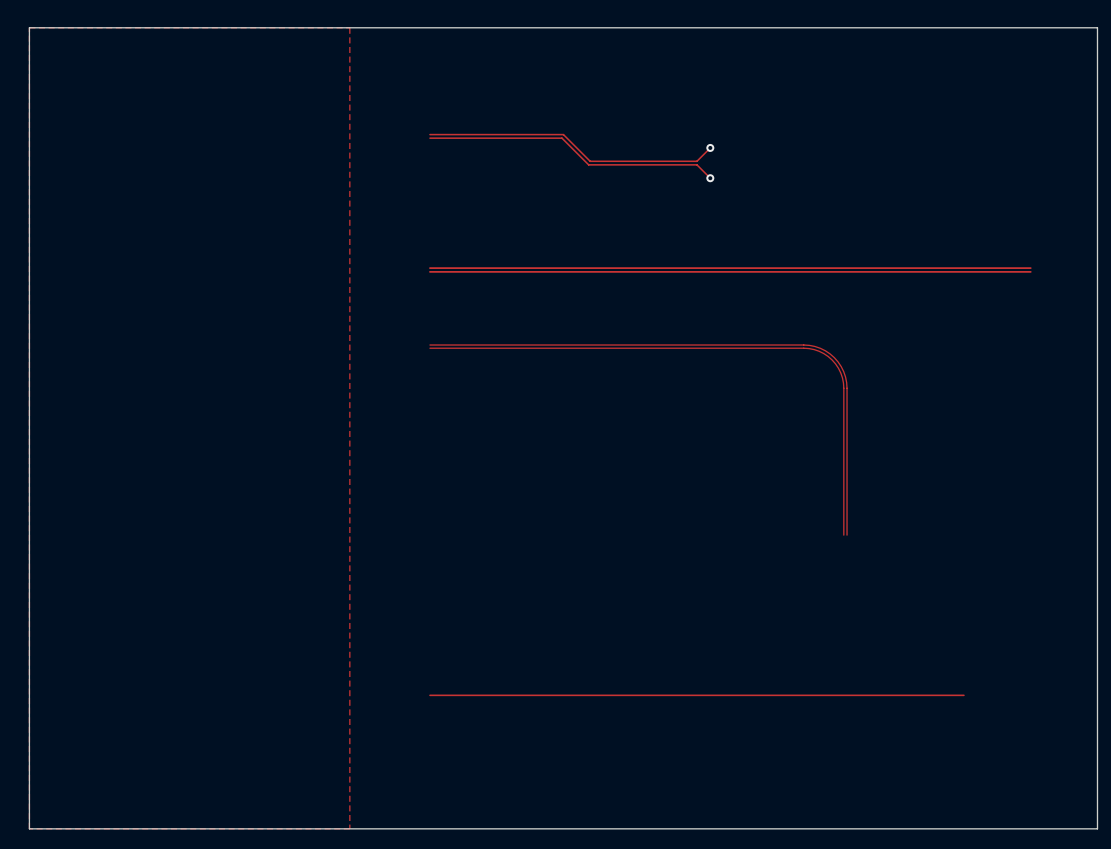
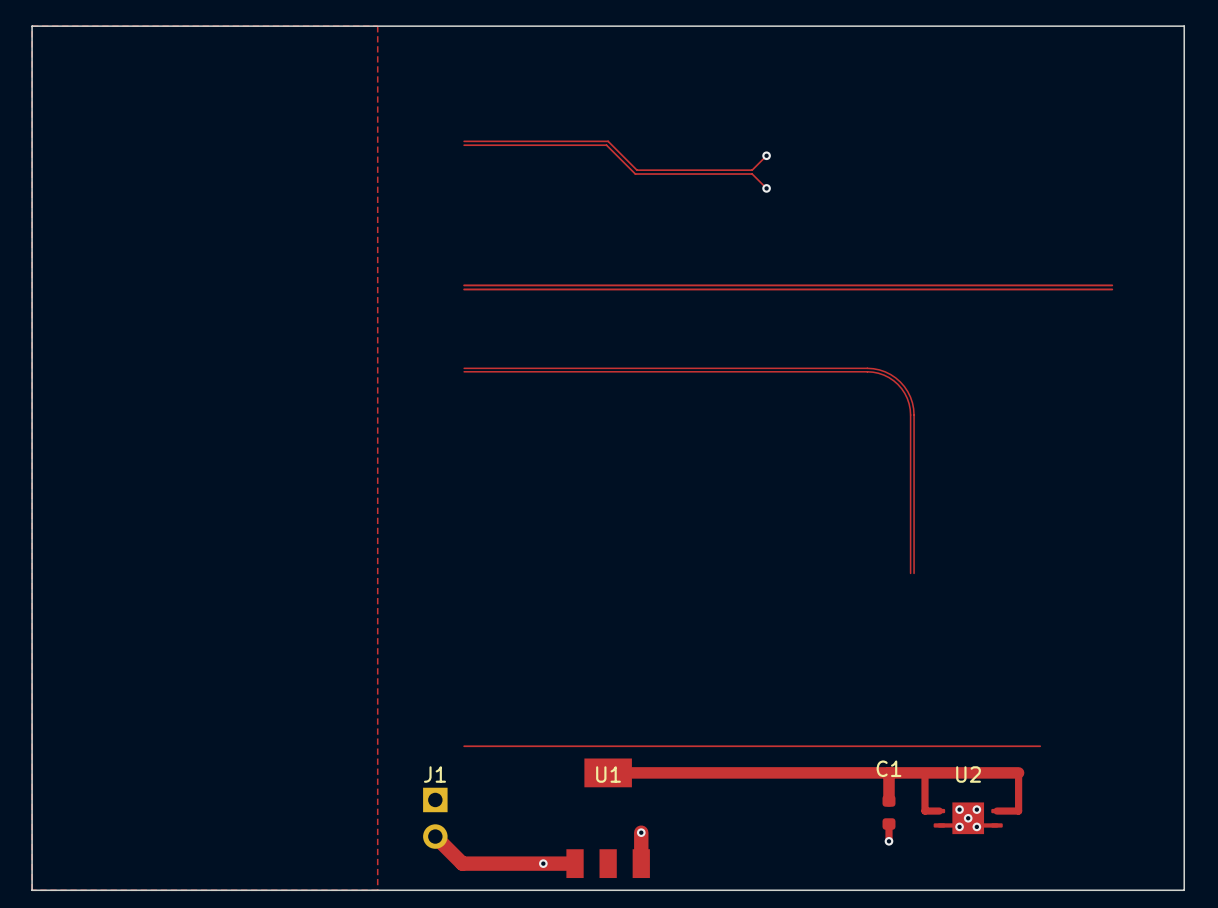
track: none -> (631, 772) (1018, 772) (1018, 811) (997, 811)
track: none -> (888, 772) (888, 800)
track: none -> (925, 772) (925, 811) (939, 811)
via: none -> (959, 809)
via: none -> (976, 809)
C1: none -> (888, 812)
J1: none -> (435, 818)
U1: none -> (608, 818)
U2: none -> (968, 818)
via: none -> (968, 818)
track: none -> (888, 824) (888, 841)
track: none -> (939, 825) (952, 825)
track: none -> (984, 825) (997, 825)
via: none -> (959, 826)
via: none -> (976, 826)
track: none -> (641, 832) (641, 863)
via: none -> (641, 832)
track: none -> (435, 836) (462, 863) (575, 863)
via: none -> (888, 841)
via: none -> (543, 863)

